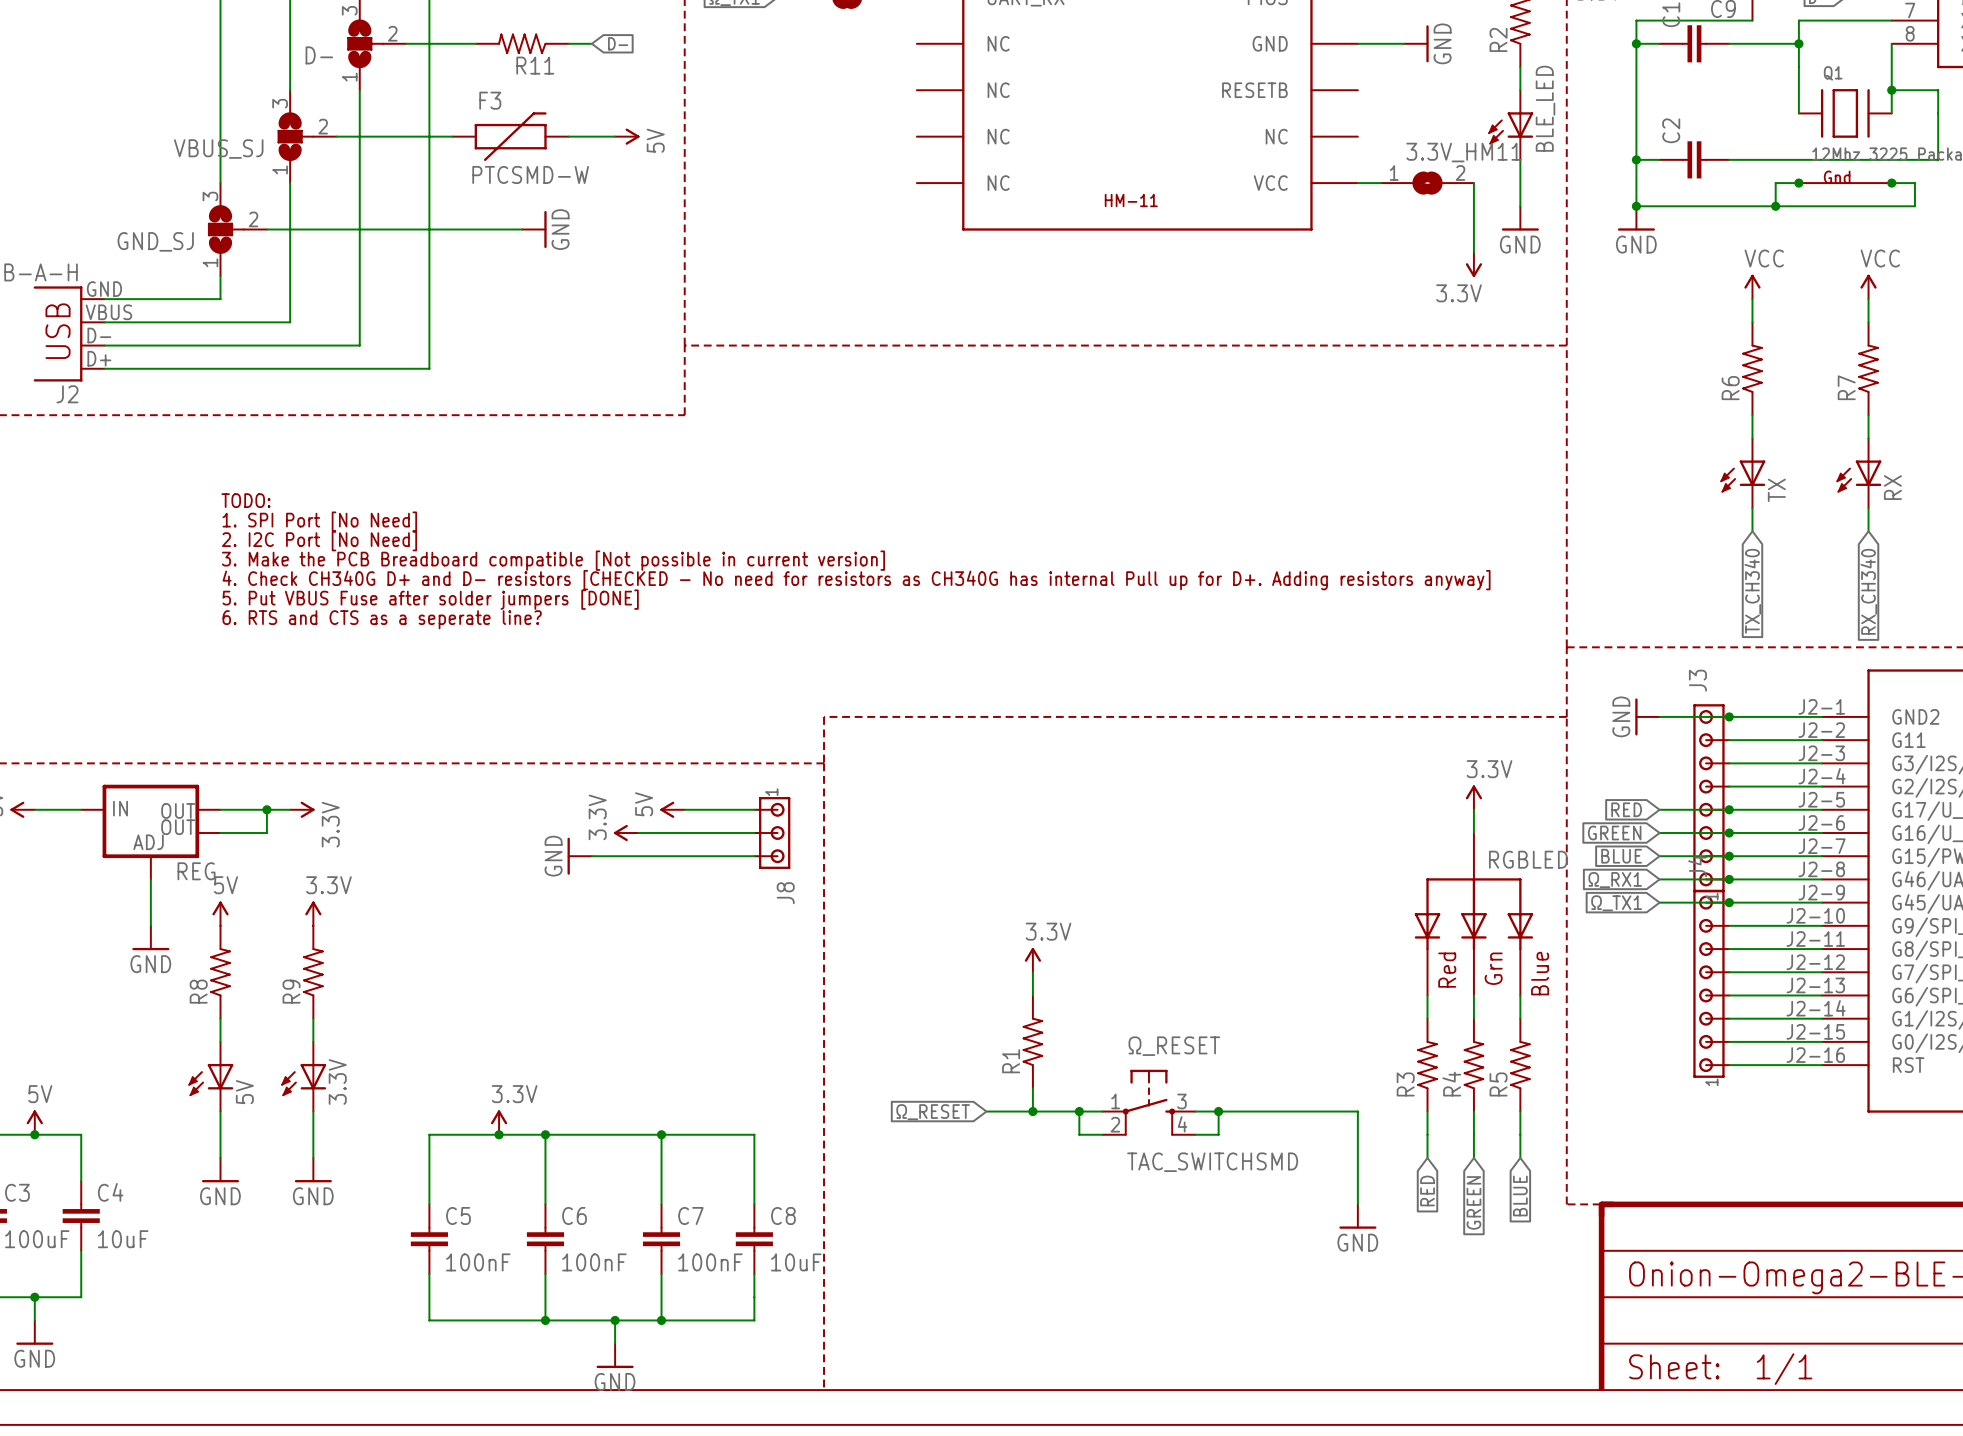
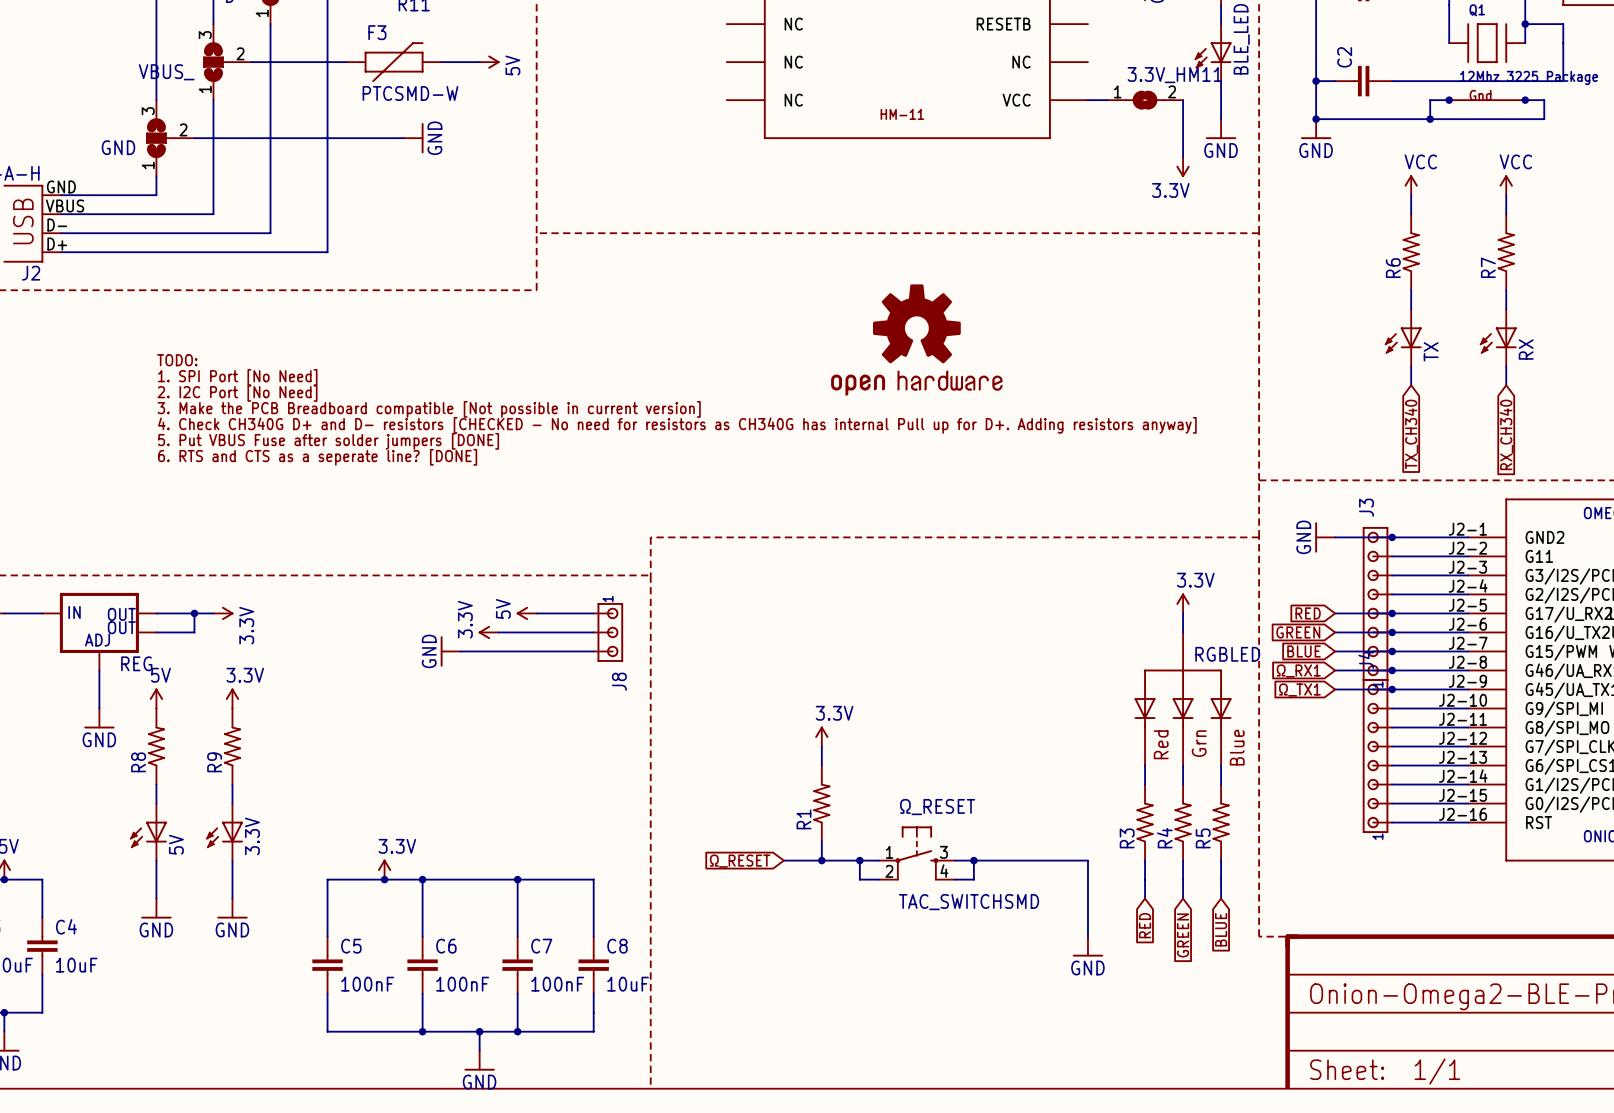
VBUS_SJ name: VBUS_SJ (218, 149) -> VBUS_ (166, 72)
GND_SJ name: GND_SJ (155, 241) -> GND (118, 147)
part: none -> (916, 340)
text: 6. RTS and CTS as a seperate line? (382, 619) -> 6. RTS and CTS as a seperate line? [DONE] (317, 457)

